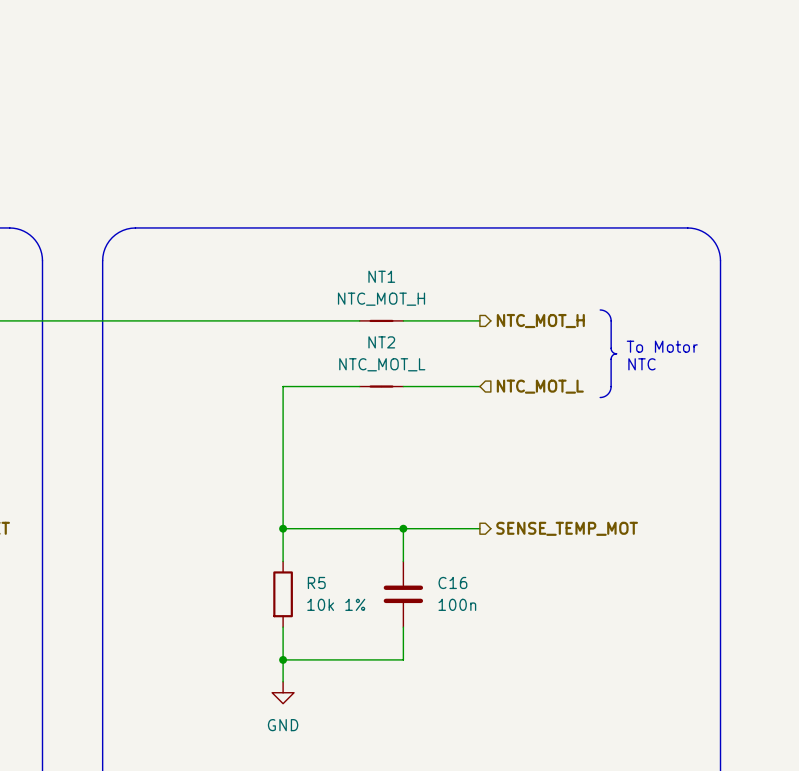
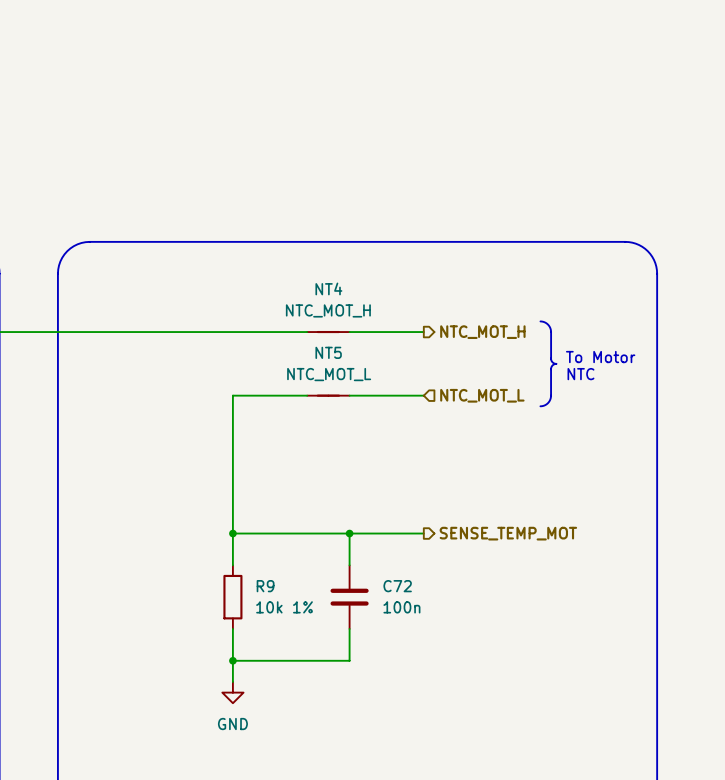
NT1 name: NT1 (381, 276) -> NT4 (328, 288)
NT2 name: NT2 (381, 342) -> NT5 (328, 352)
R5 name: R5 (316, 582) -> R9 (265, 586)
C16 name: C16 (452, 582) -> C72 (397, 586)

